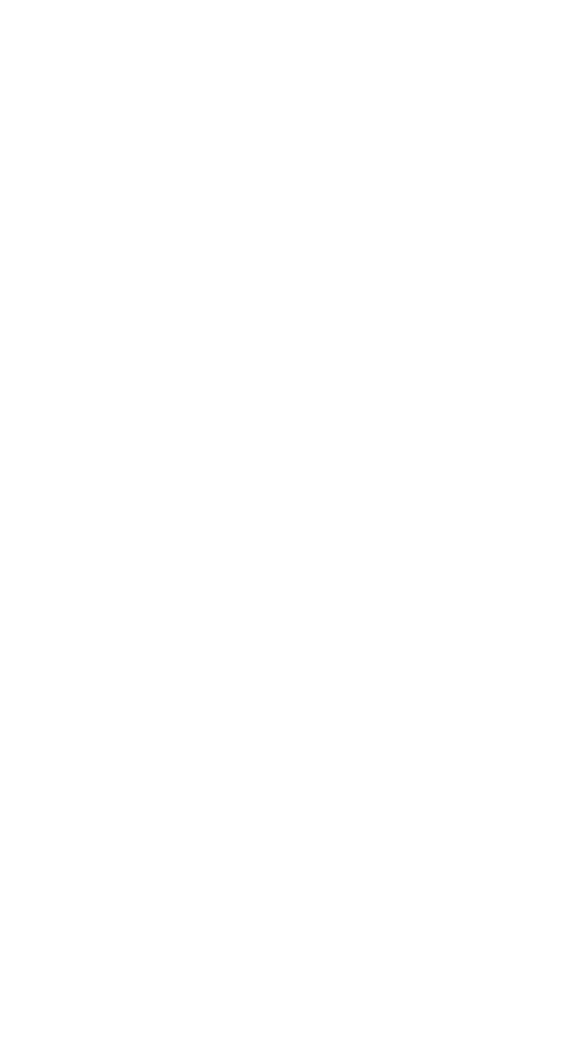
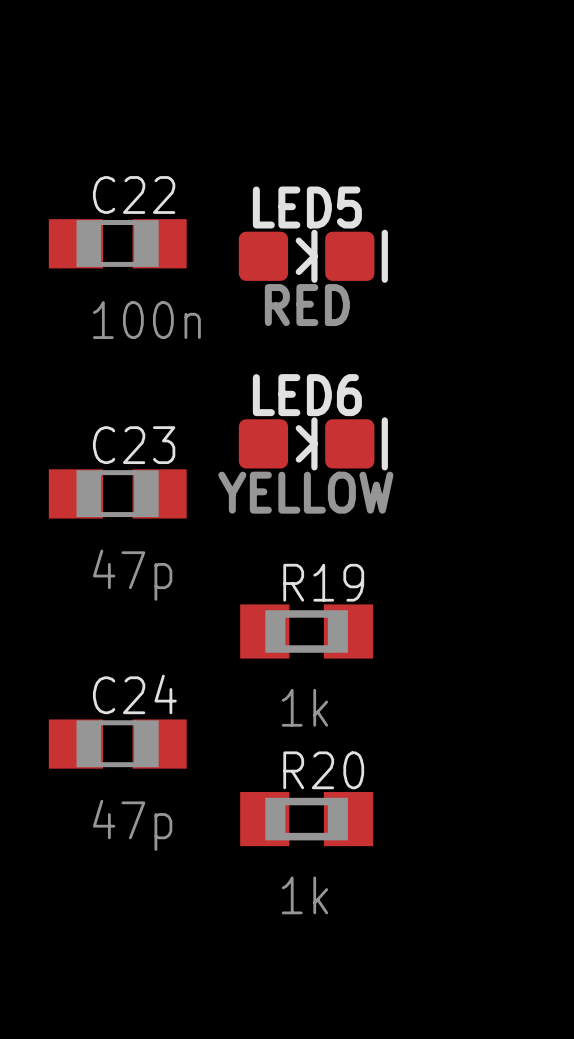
C22: none -> 100n (117, 243)
LED5: none -> RED (313, 256)
LED6: none -> YELLOW (313, 443)
C23: none -> 47p (117, 493)
R19: none -> 1k (306, 631)
C24: none -> 47p (117, 744)
R20: none -> 1k (306, 819)

